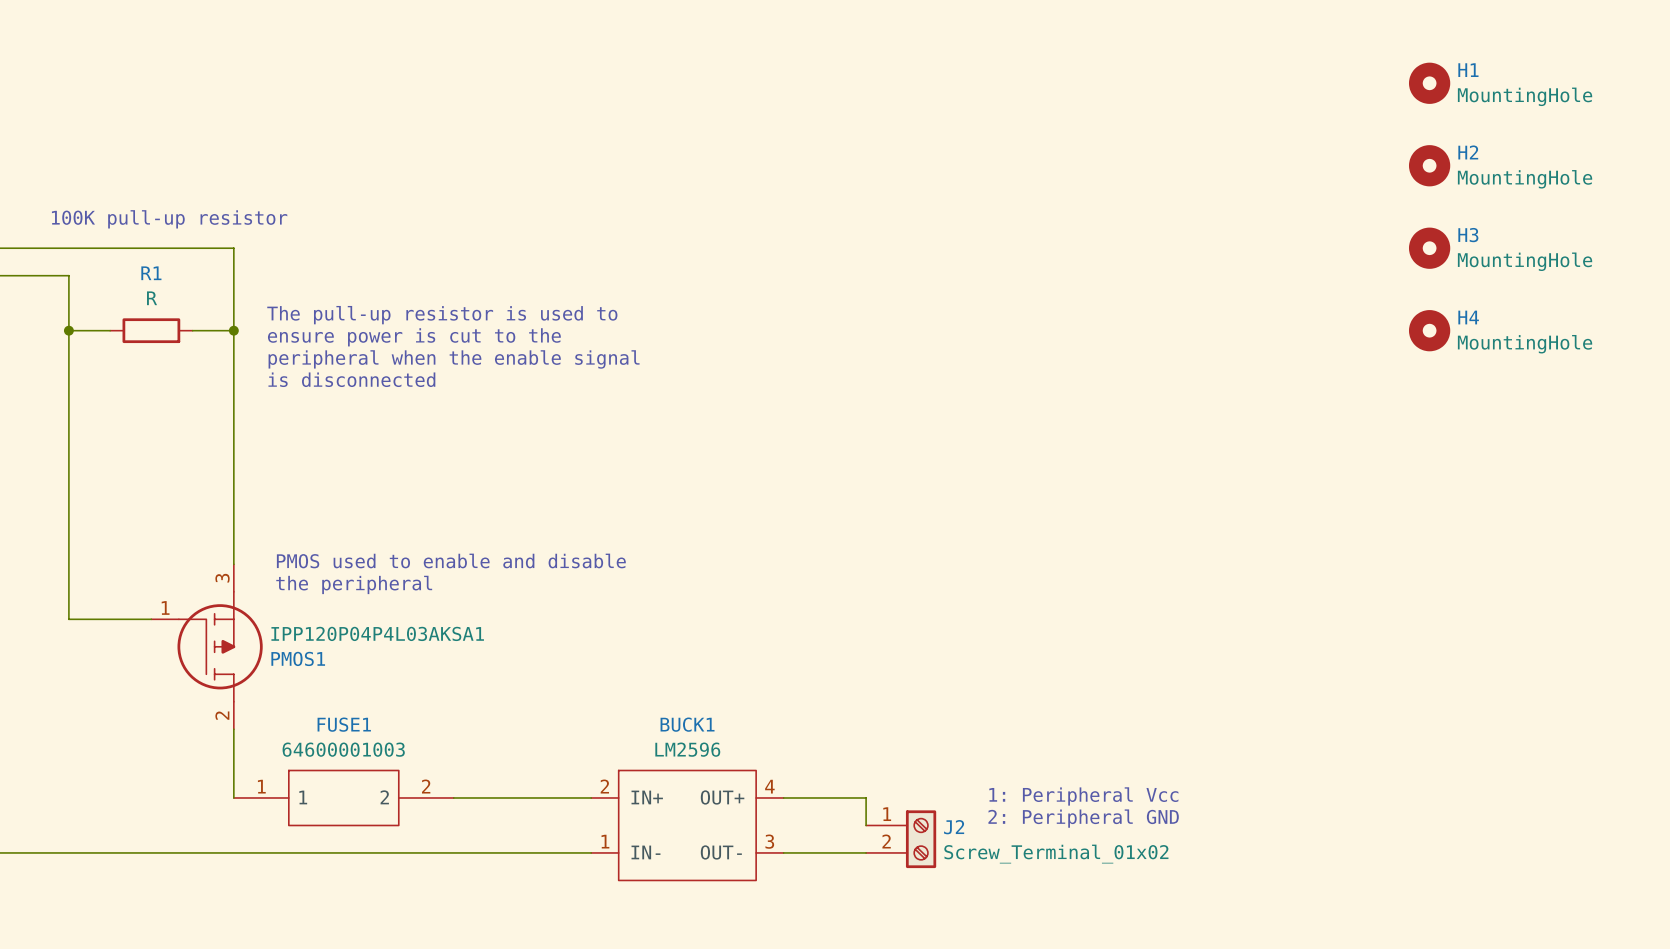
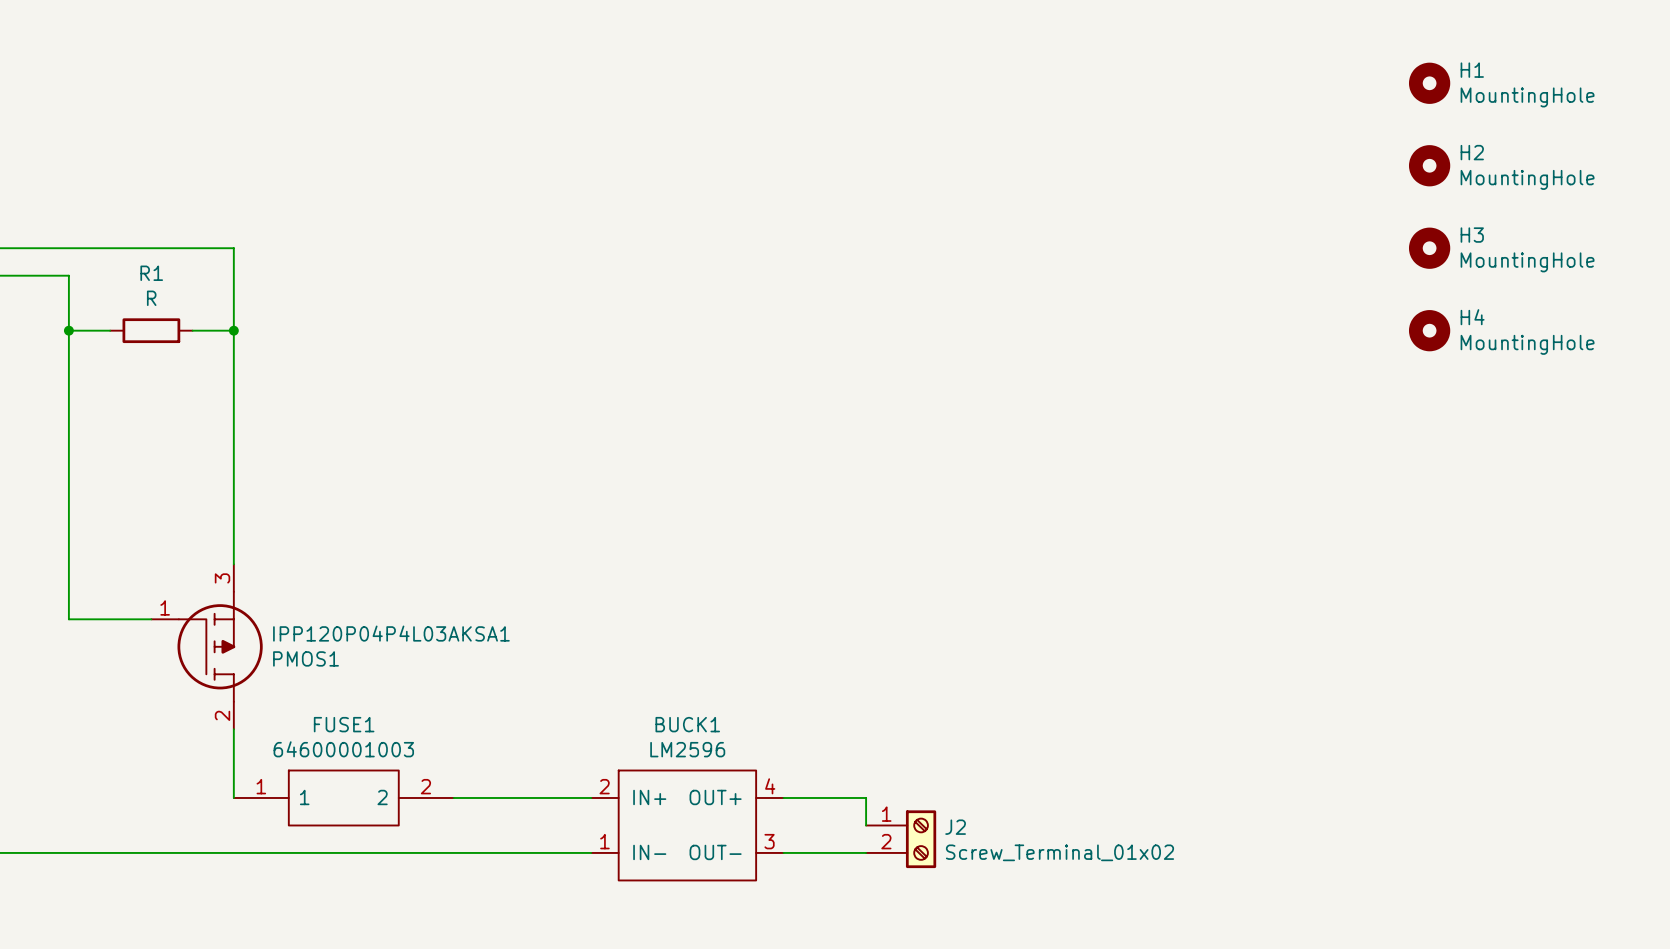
text: 100K pull-up resistor (169, 219) -> none
text: The pull-up resistor is used to (442, 315) -> none
text: ensure power is cut to the (414, 337) -> none
text: peripheral when the enable signal (454, 359) -> none
text: is disconnected (351, 379) -> none
text: PMOS used to enable and disable (451, 560) -> none
text: the peripheral (354, 584) -> none
text: 1: Peripheral Vcc (1083, 796) -> none
text: 2: Peripheral GND (1083, 818) -> none

